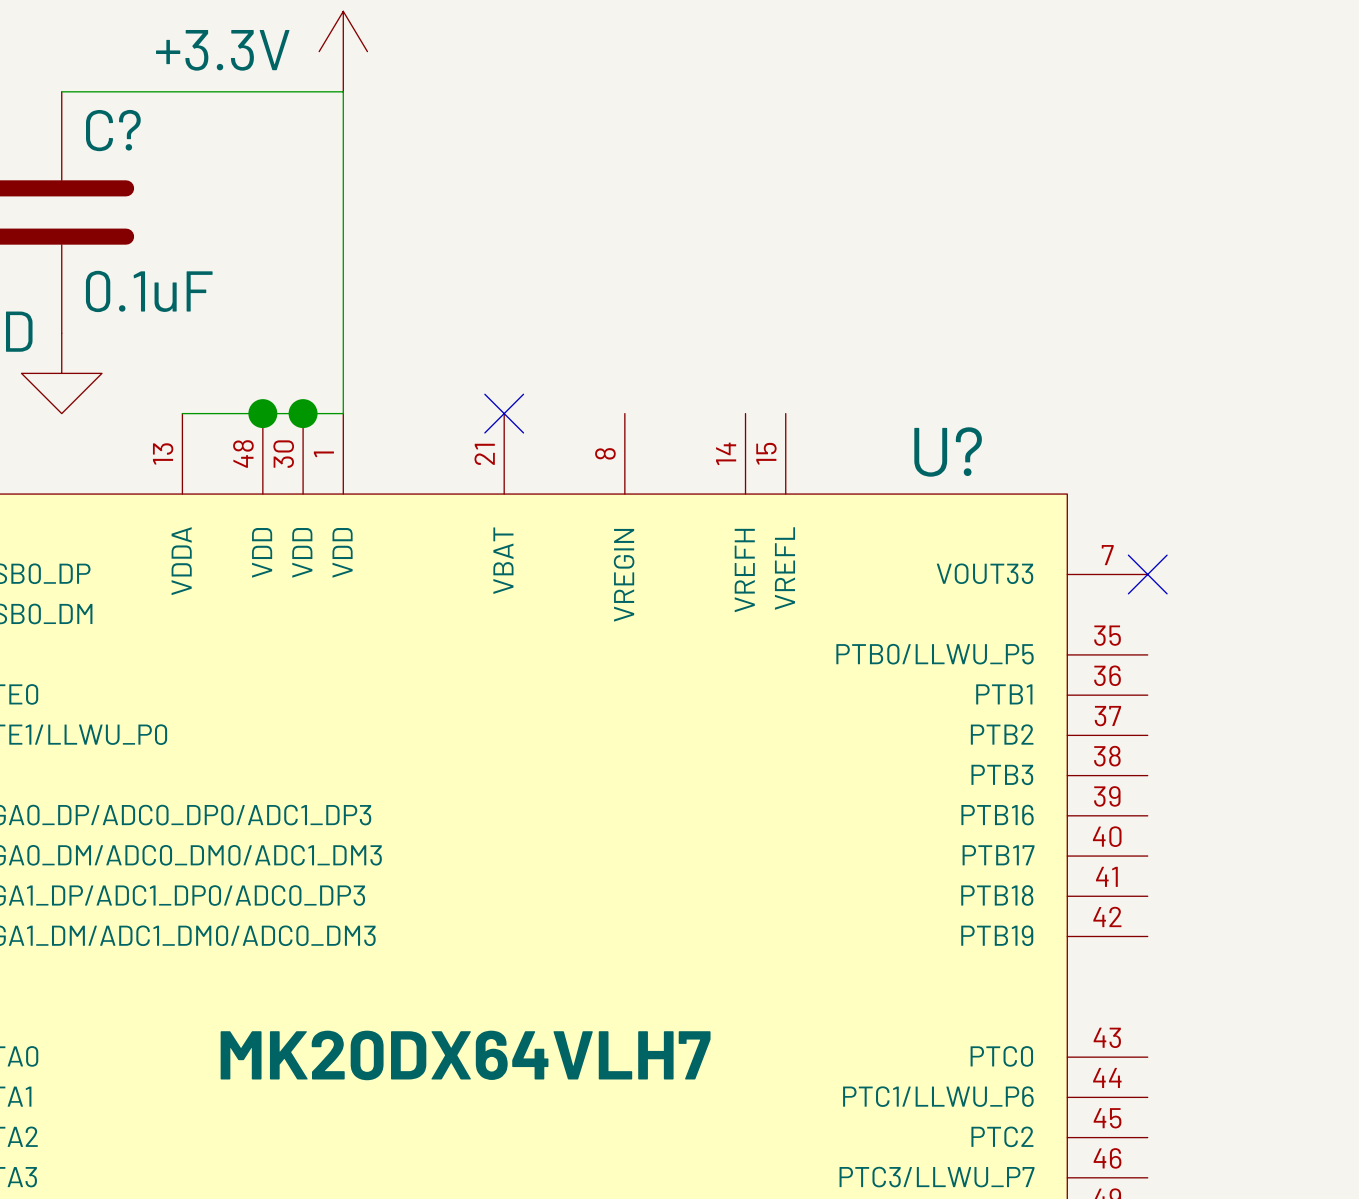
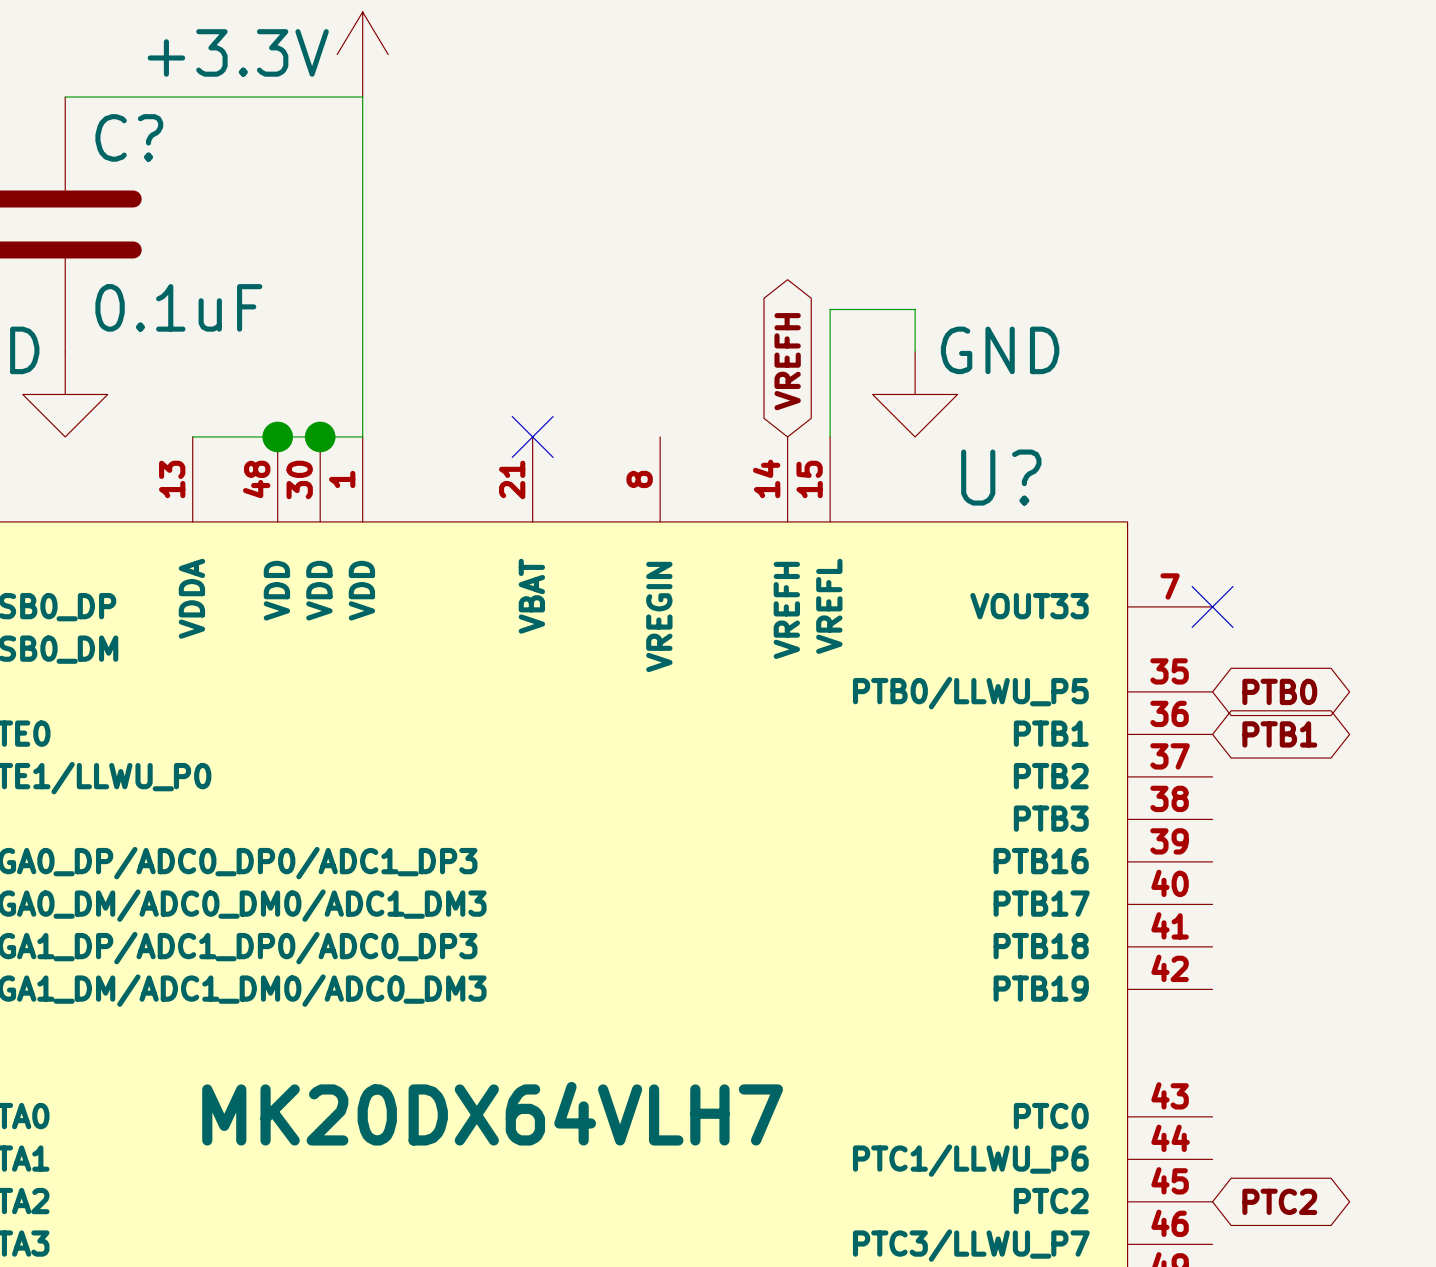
wire: none -> (915, 351) (915, 309) (830, 309) (830, 436)
global label: none -> VREFH (787, 361)
power symbol: none -> GND (915, 394)
global label: none -> PTB0 (1279, 691)
global label: none -> PTB1 (1279, 734)
global label: none -> PTC2 (1279, 1201)

